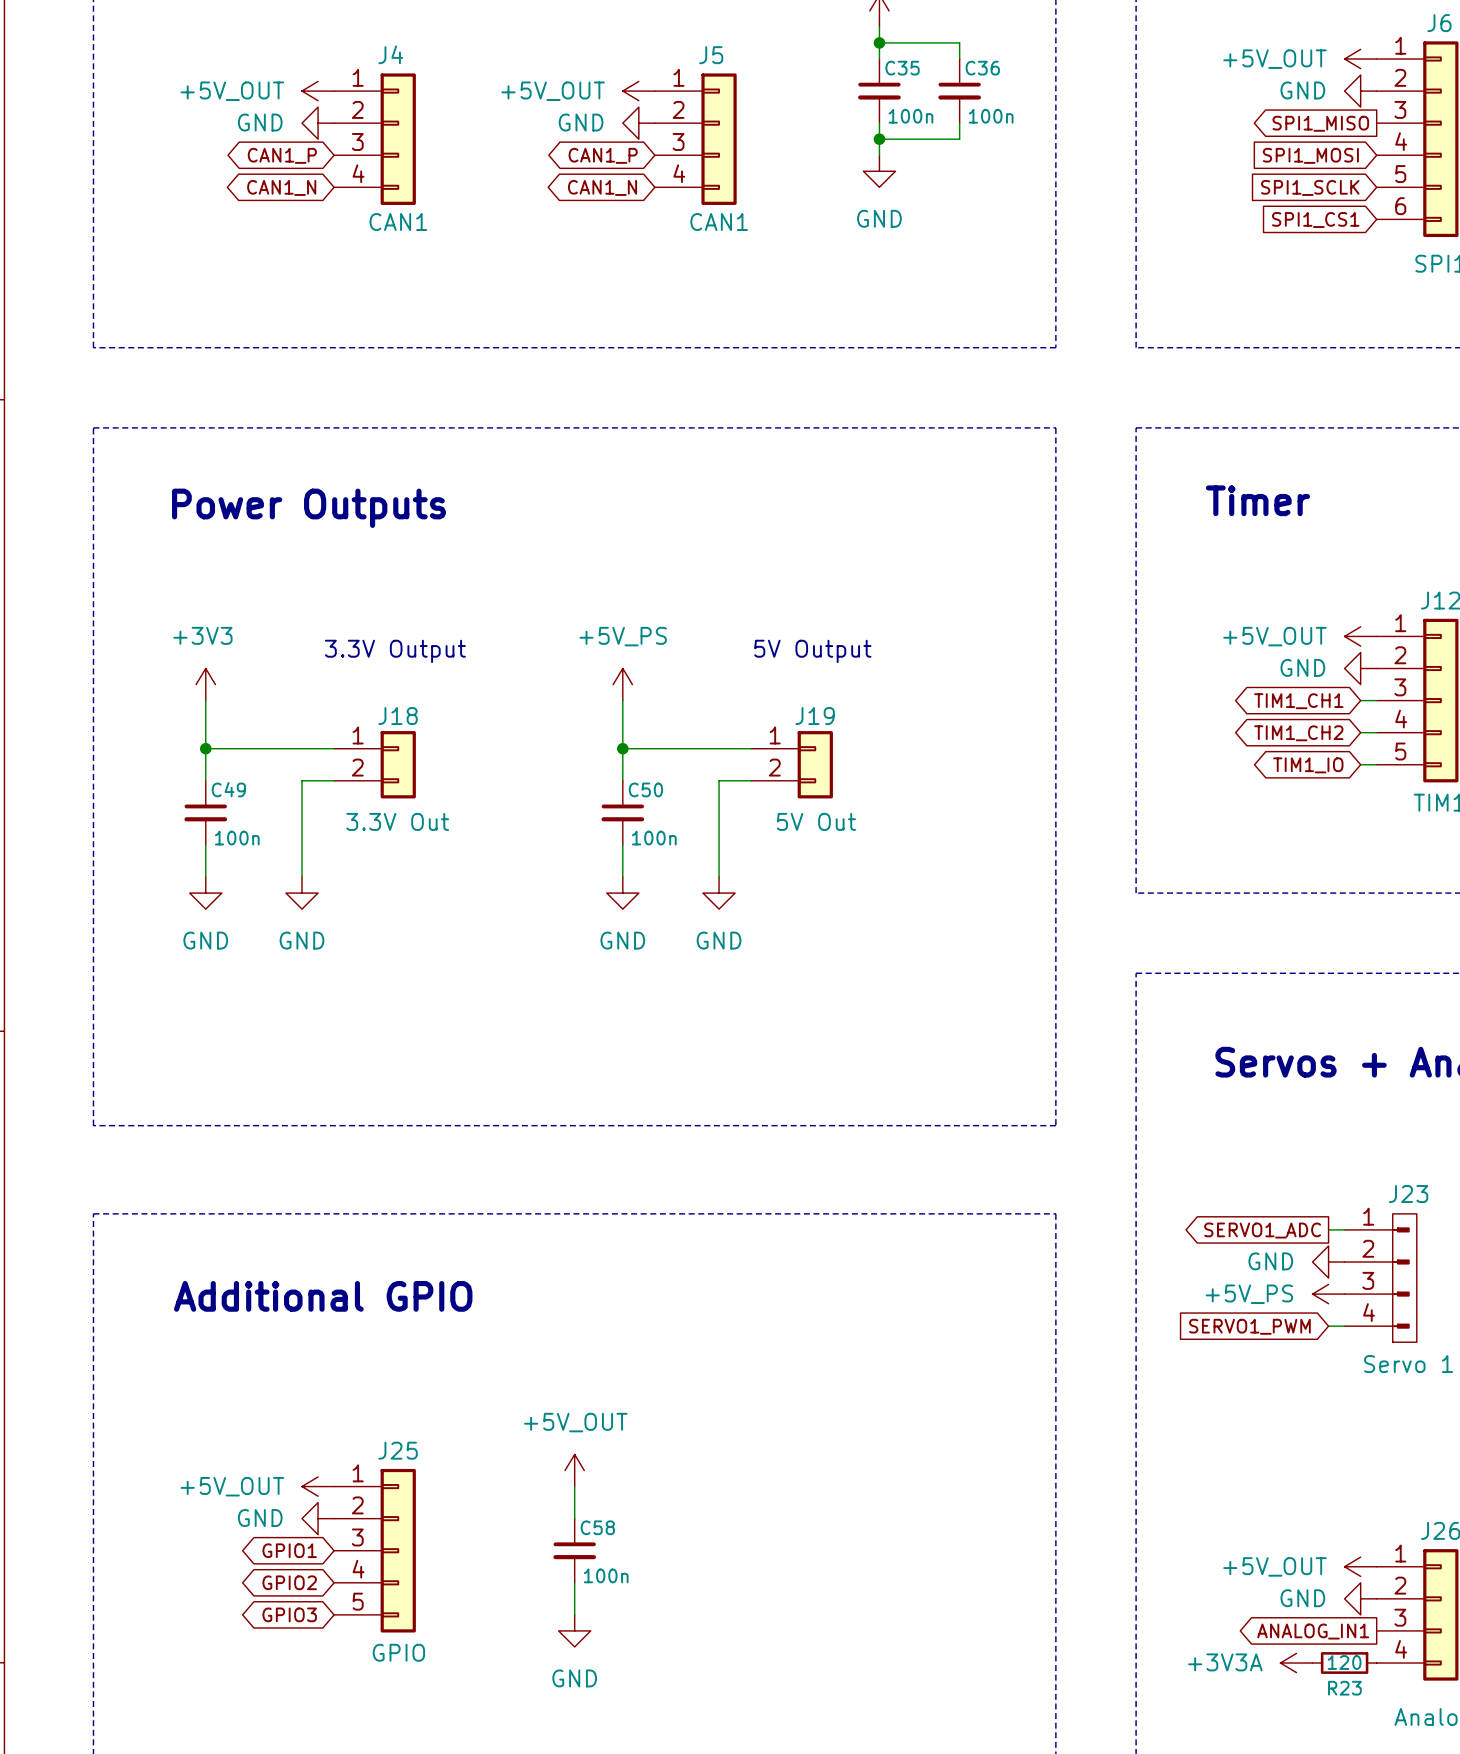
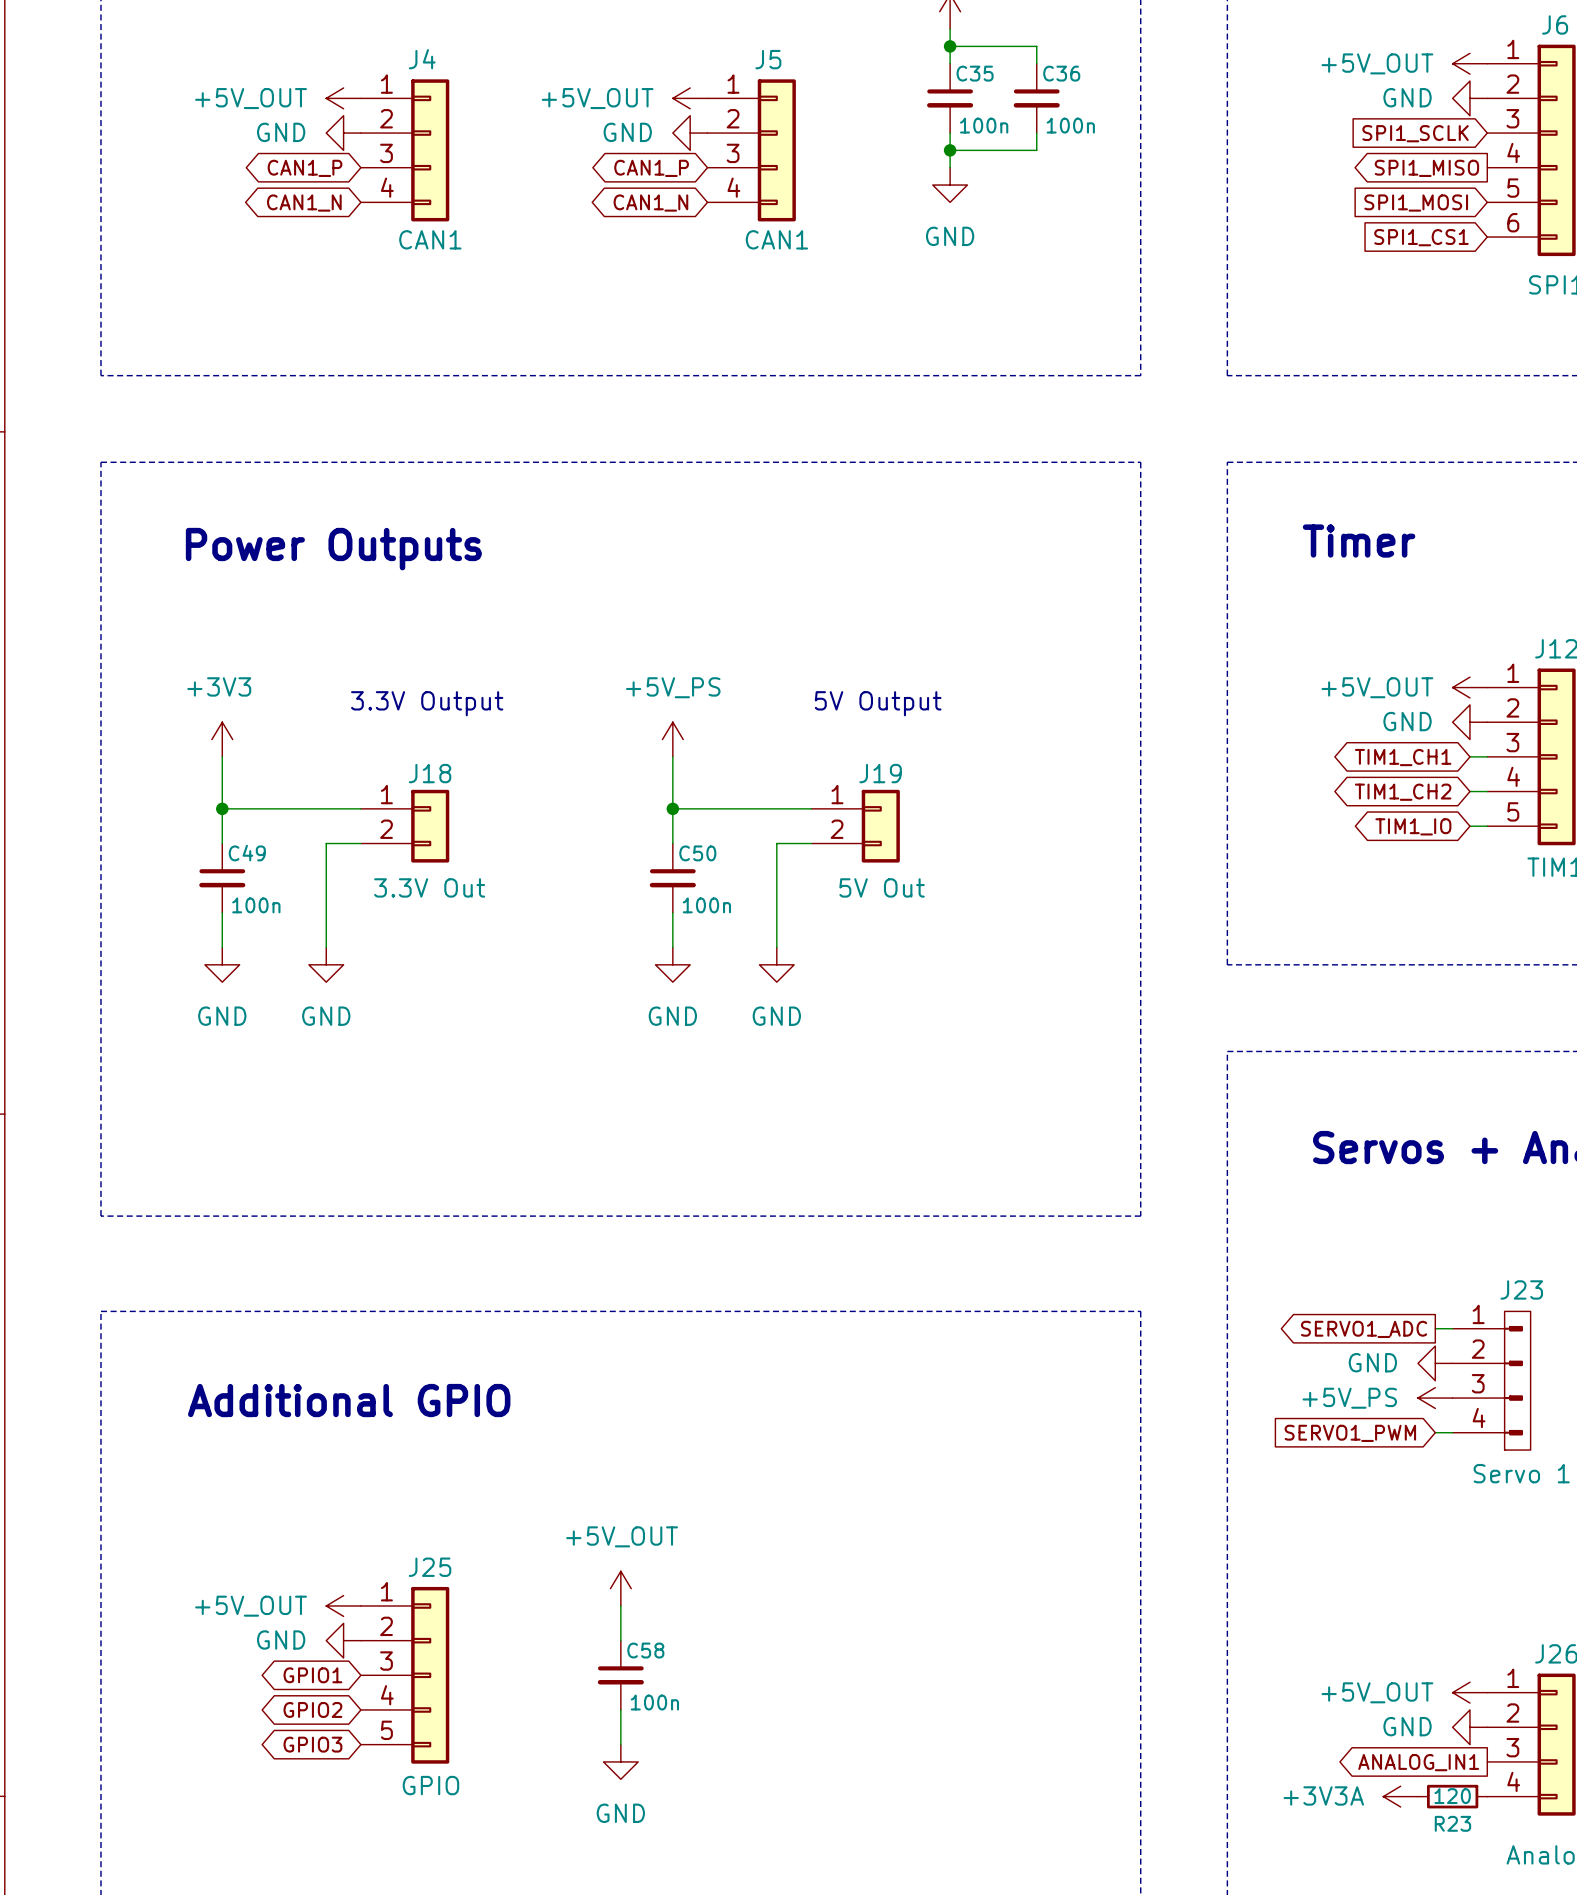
global label shape: output (1320, 123) -> input (1415, 133)
global label: SPI1_MISO (1320, 123) -> SPI1_SCLK (1415, 133)
global label shape: input (1310, 155) -> output (1426, 168)
global label: SPI1_MOSI (1310, 155) -> SPI1_MISO (1426, 168)
global label: SPI1_SCLK (1310, 187) -> SPI1_MOSI (1416, 203)

